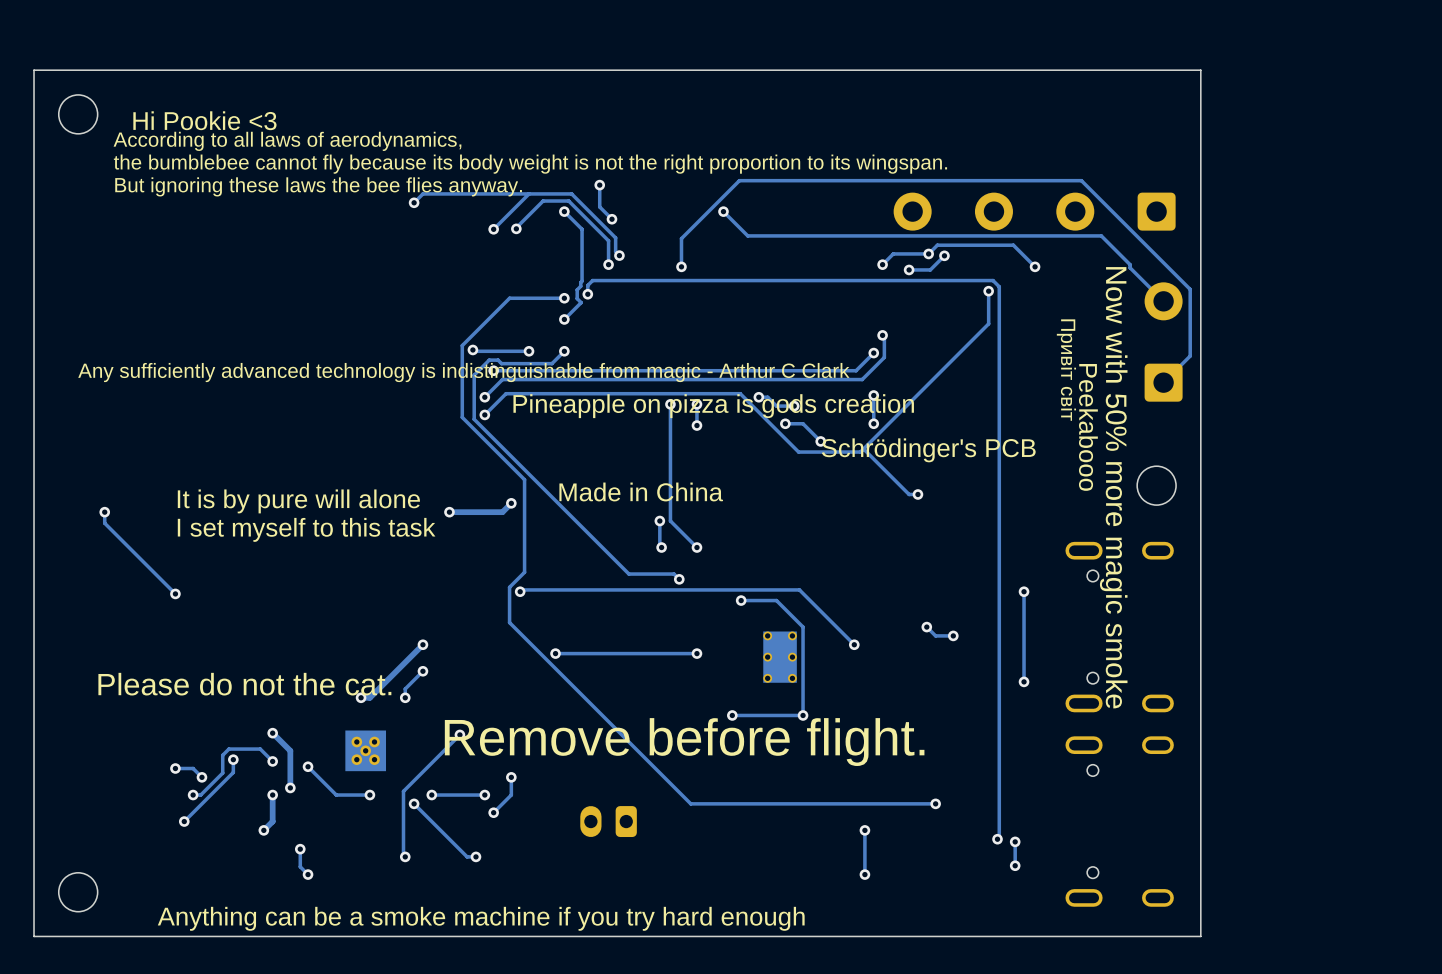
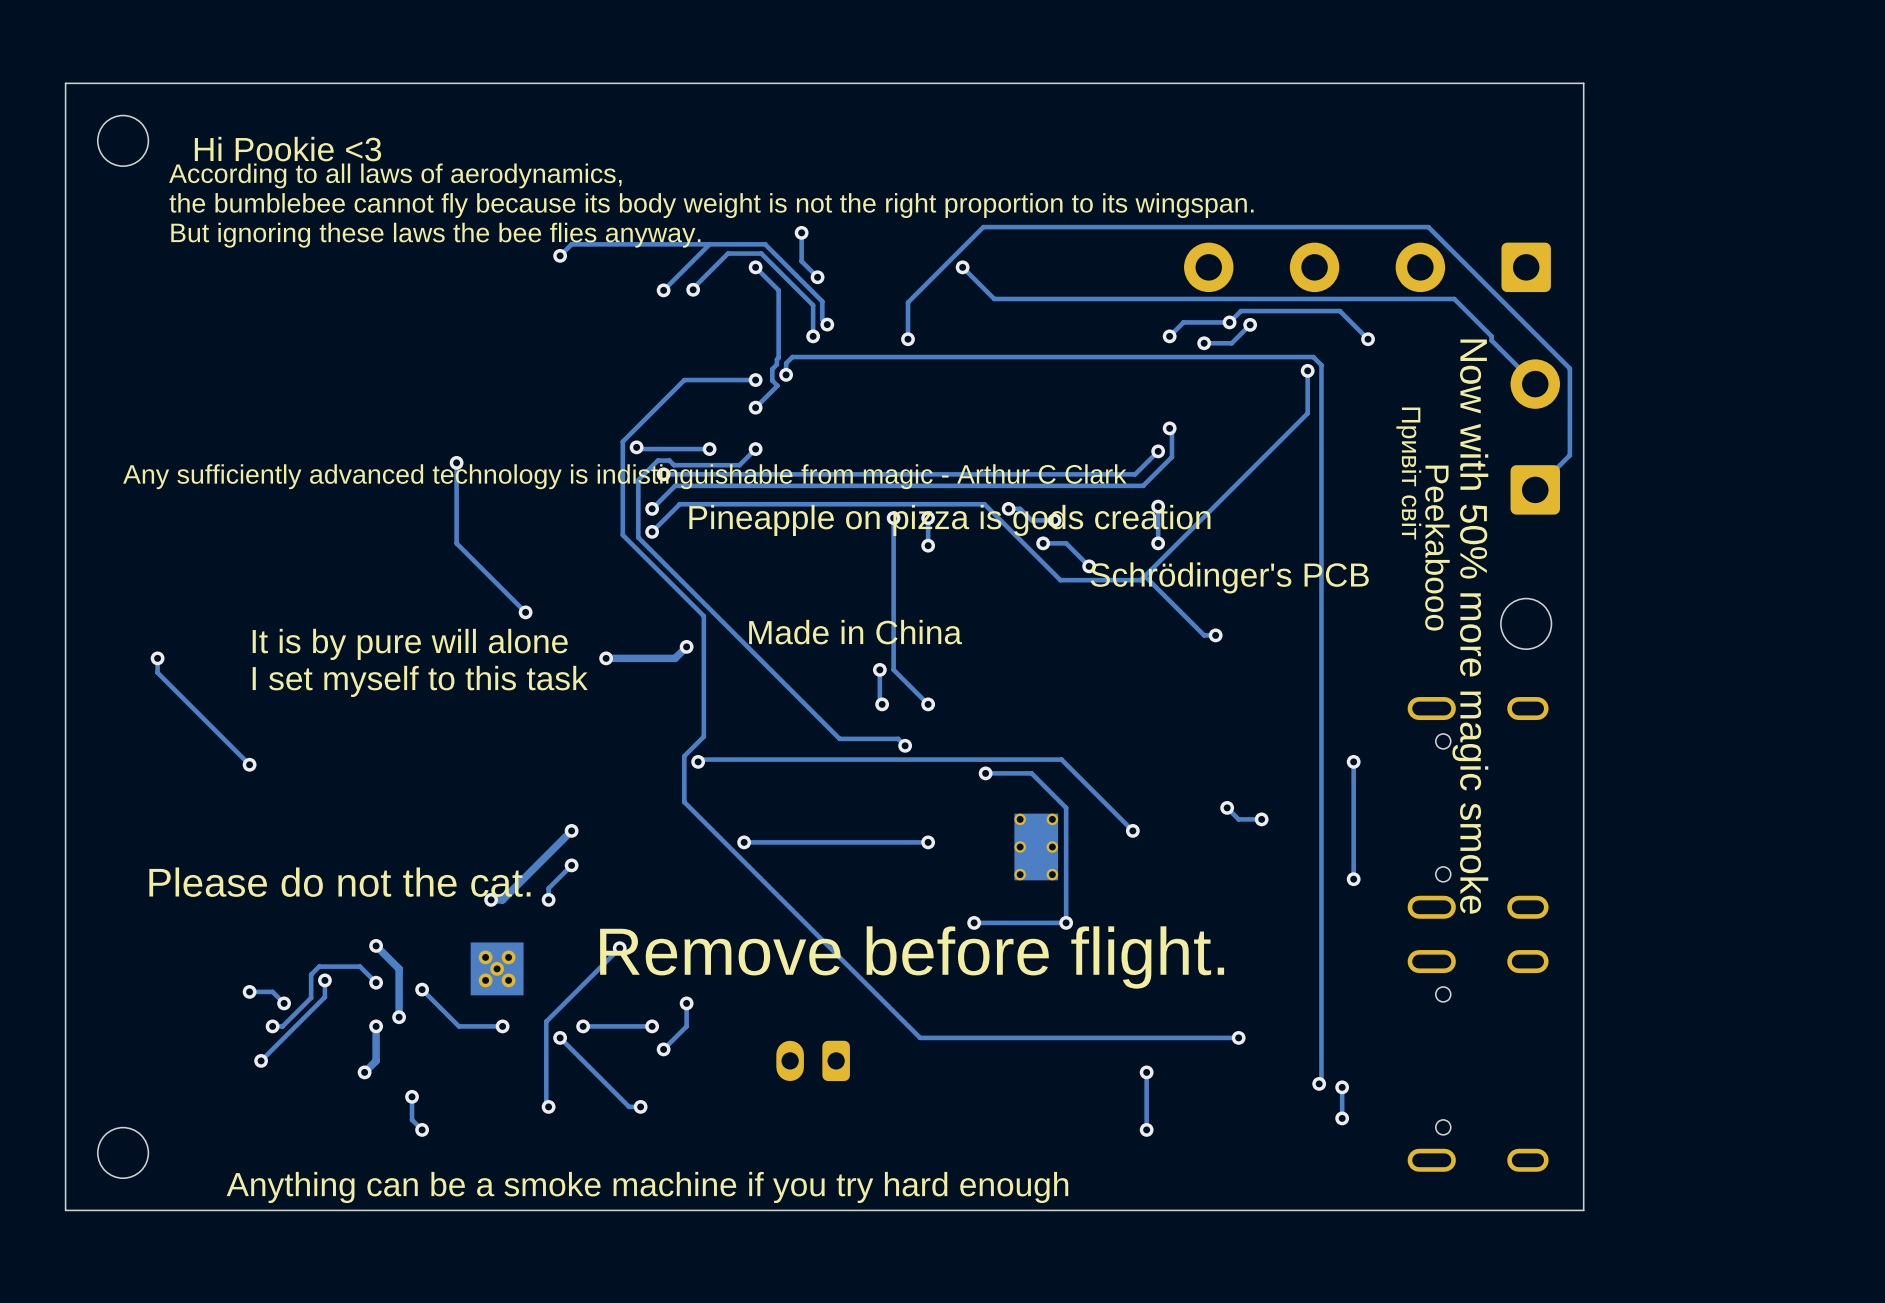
track: none -> (456, 462) (456, 543) (525, 612)
via: none -> (456, 462)
via: none -> (525, 612)

